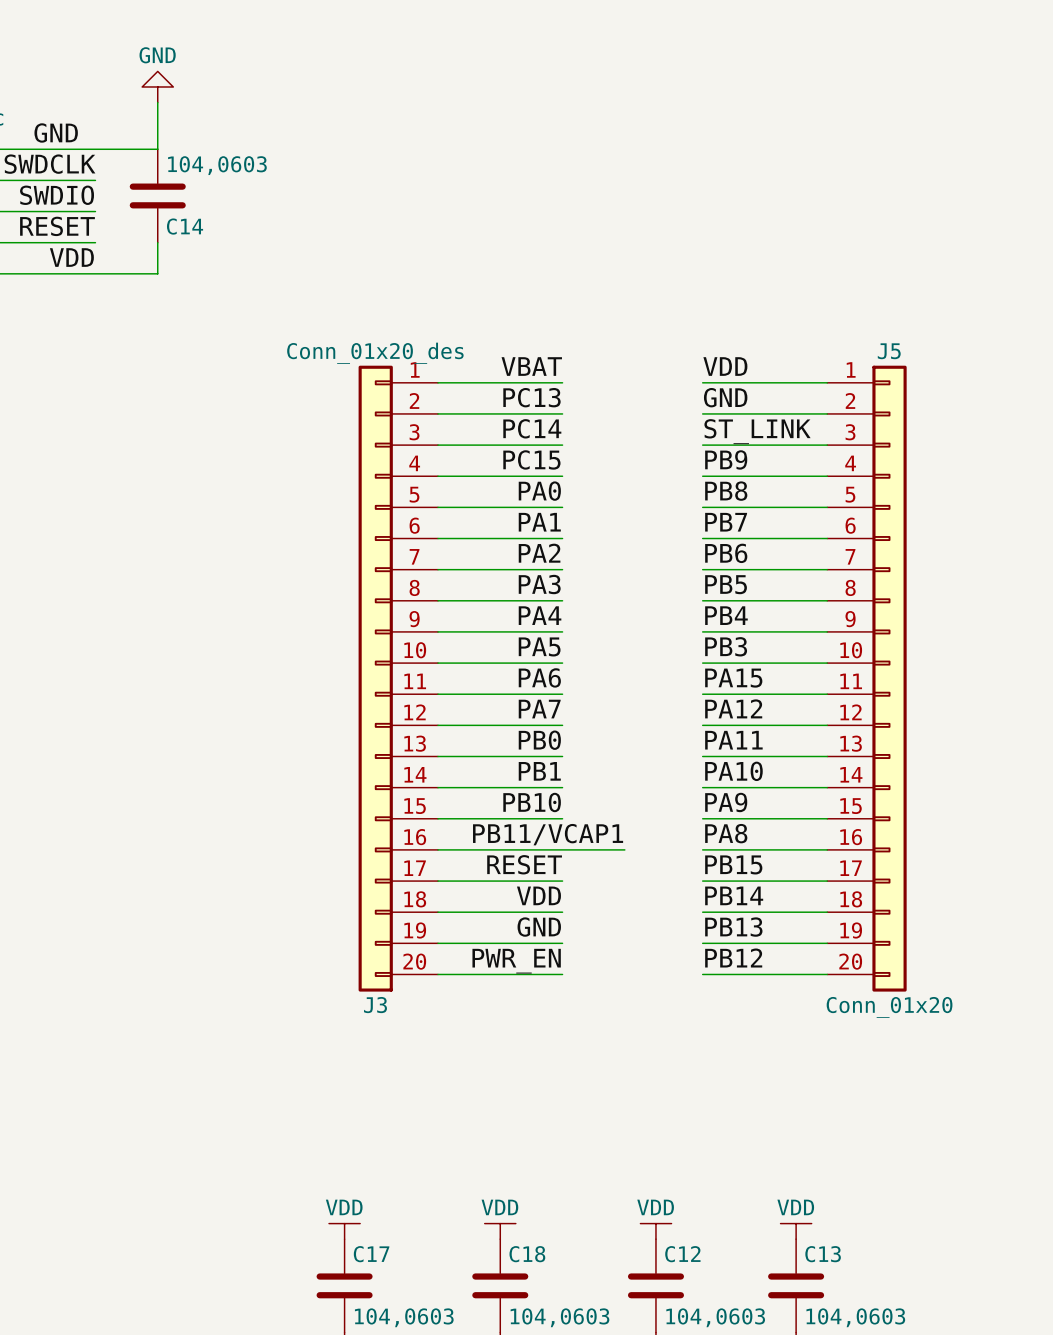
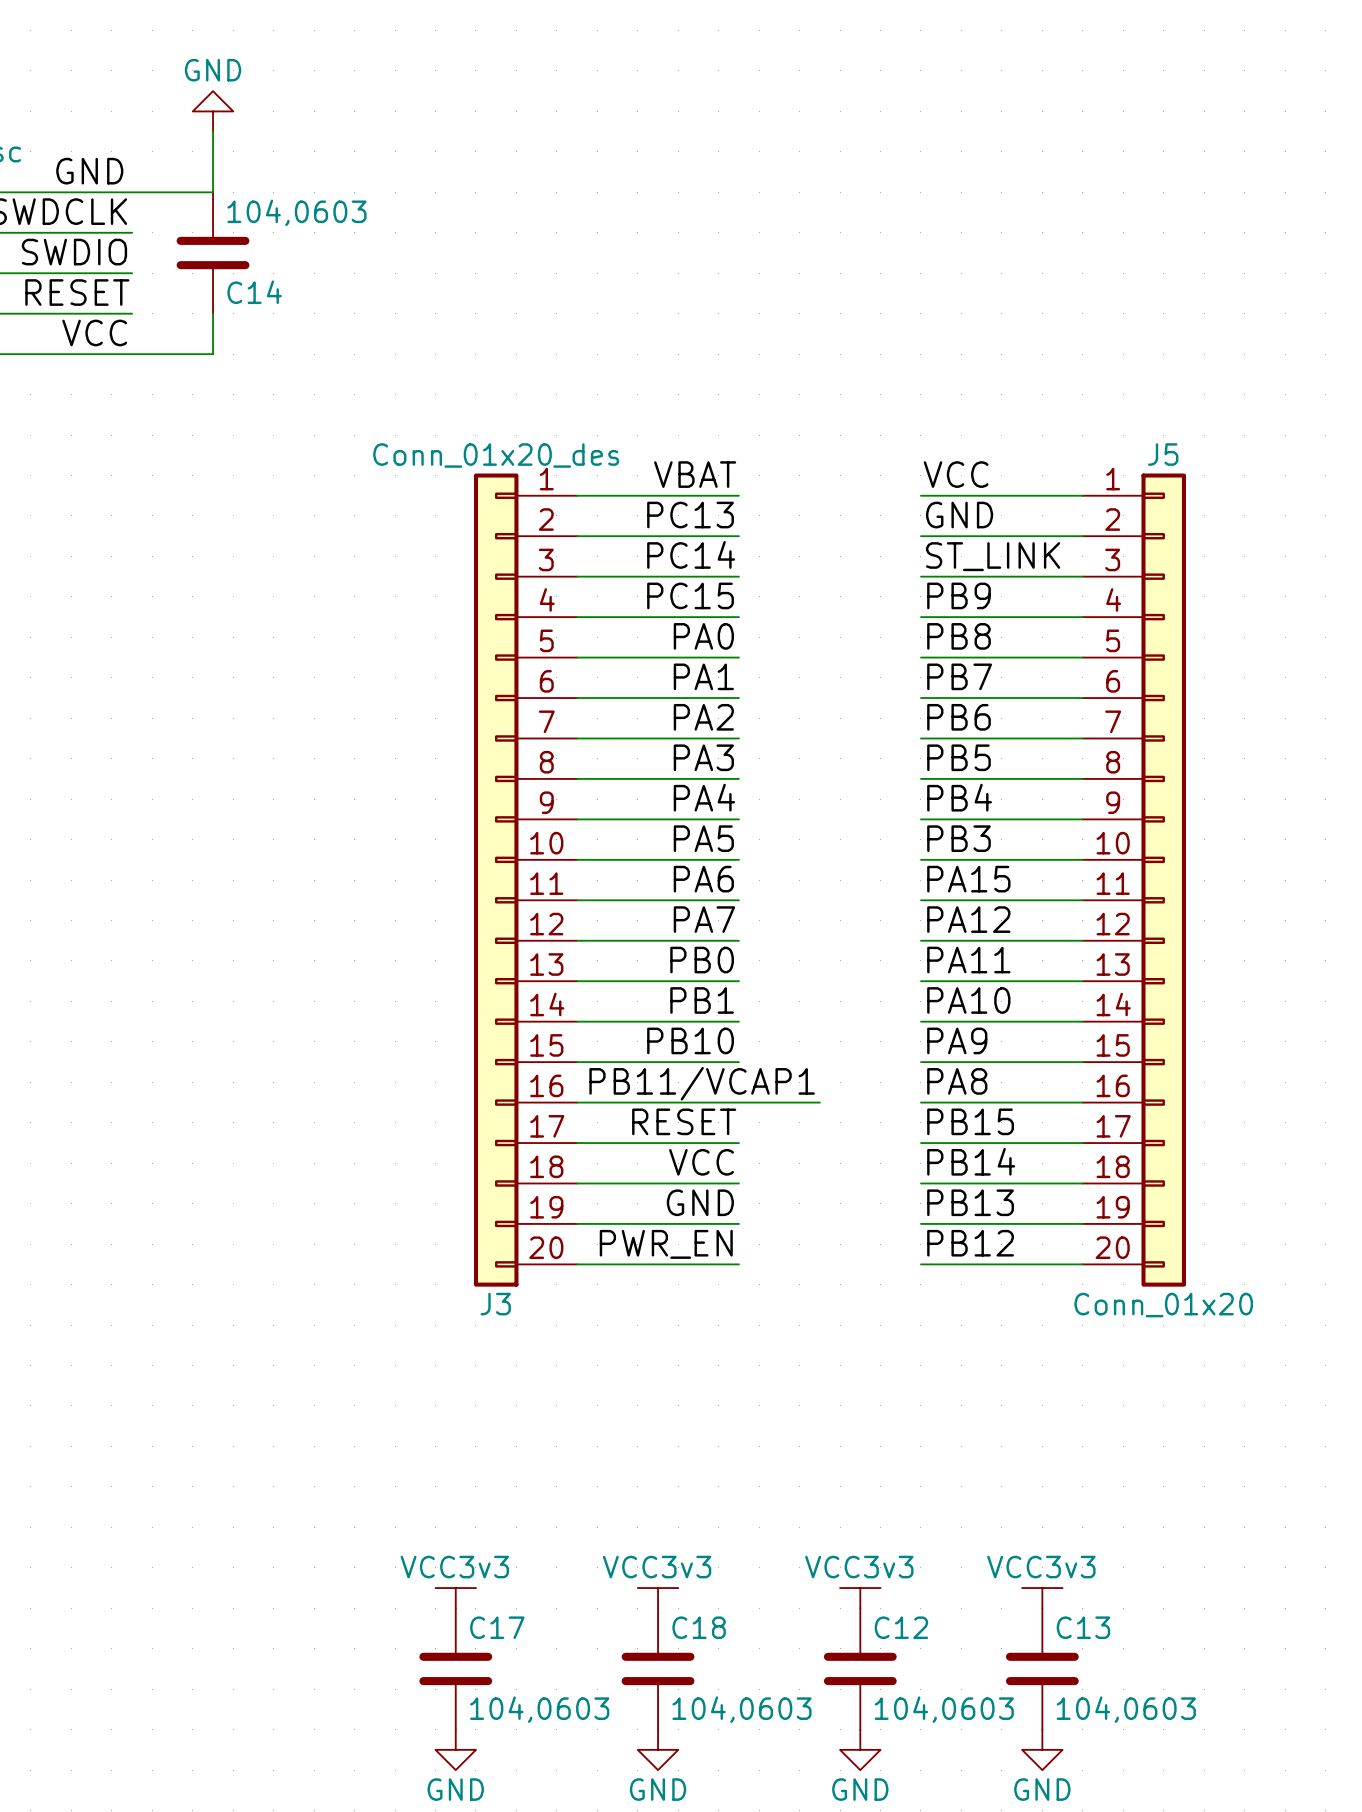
label: VDD (71, 257) -> VCC (94, 332)
label: VDD (725, 366) -> VCC (956, 474)
label: VDD (538, 895) -> VCC (701, 1162)
power symbol: VDD (344, 1231) -> VCC3v3 (455, 1598)
power symbol: VDD (500, 1231) -> VCC3v3 (658, 1598)
power symbol: VDD (655, 1231) -> VCC3v3 (860, 1598)
power symbol: VDD (796, 1231) -> VCC3v3 (1042, 1598)

